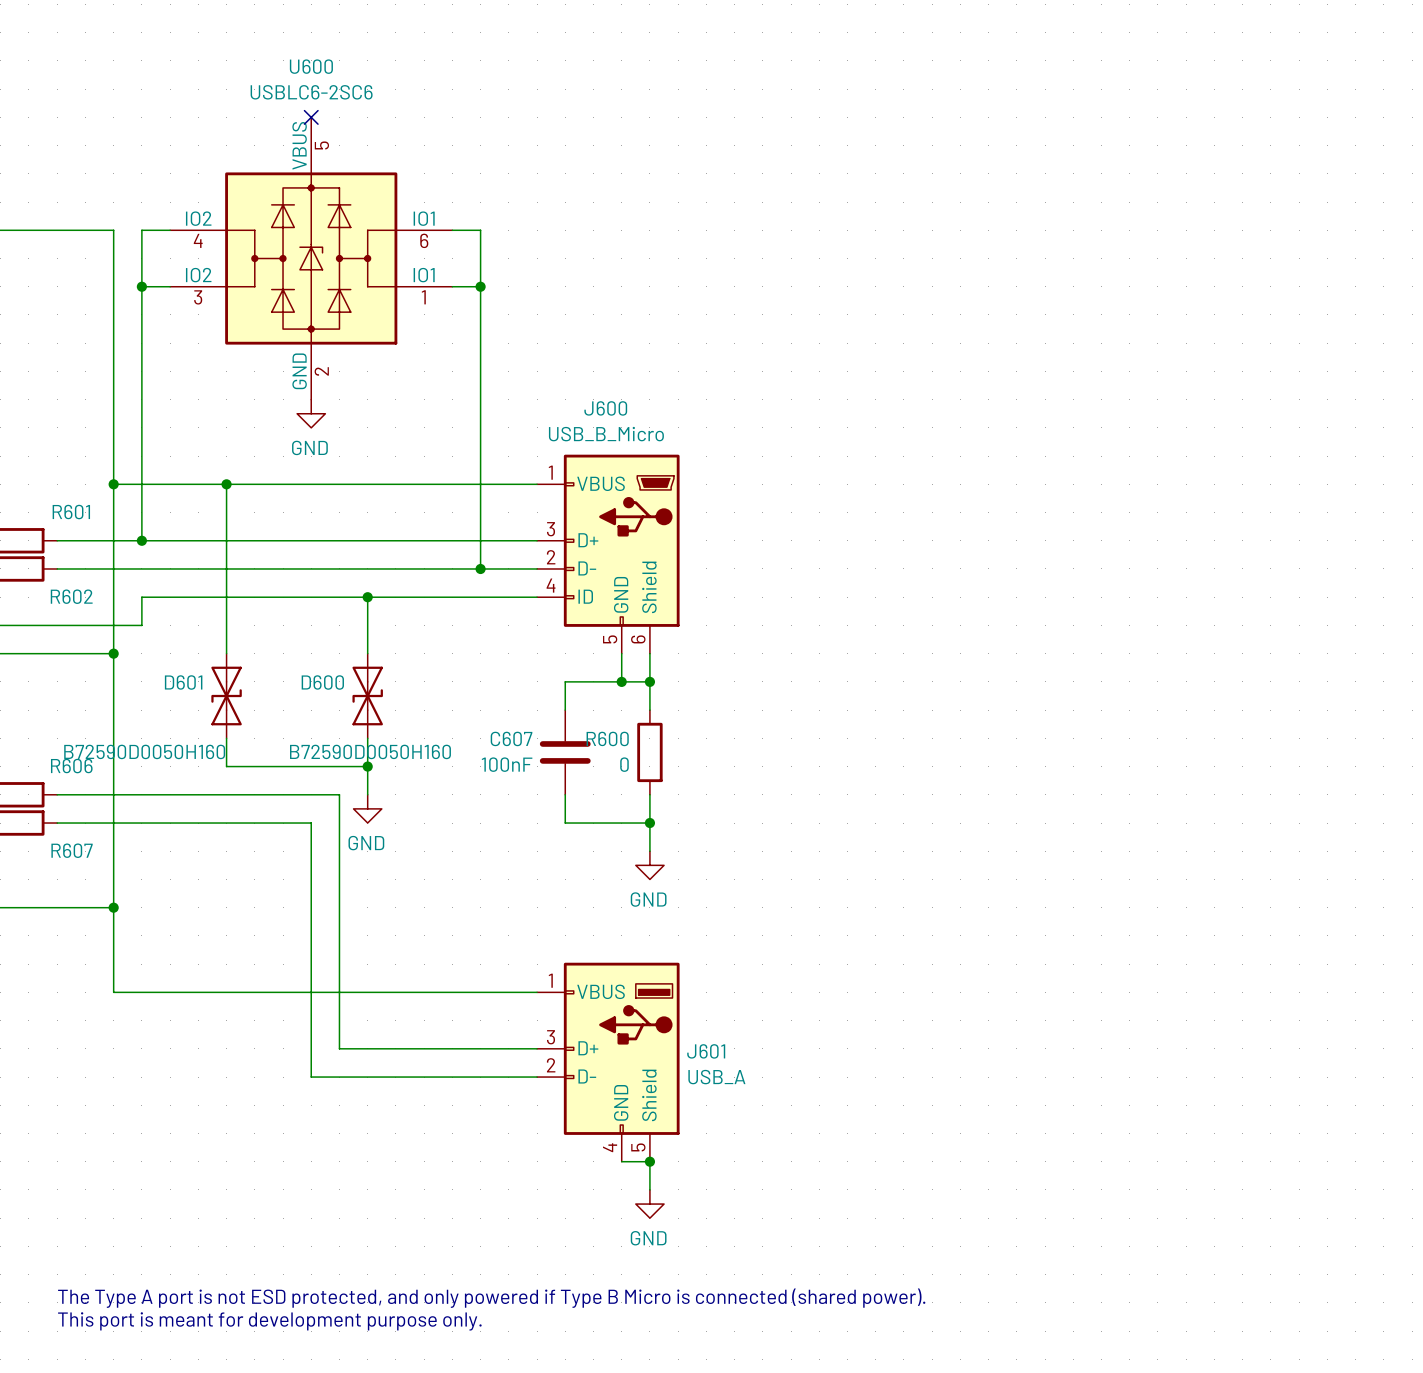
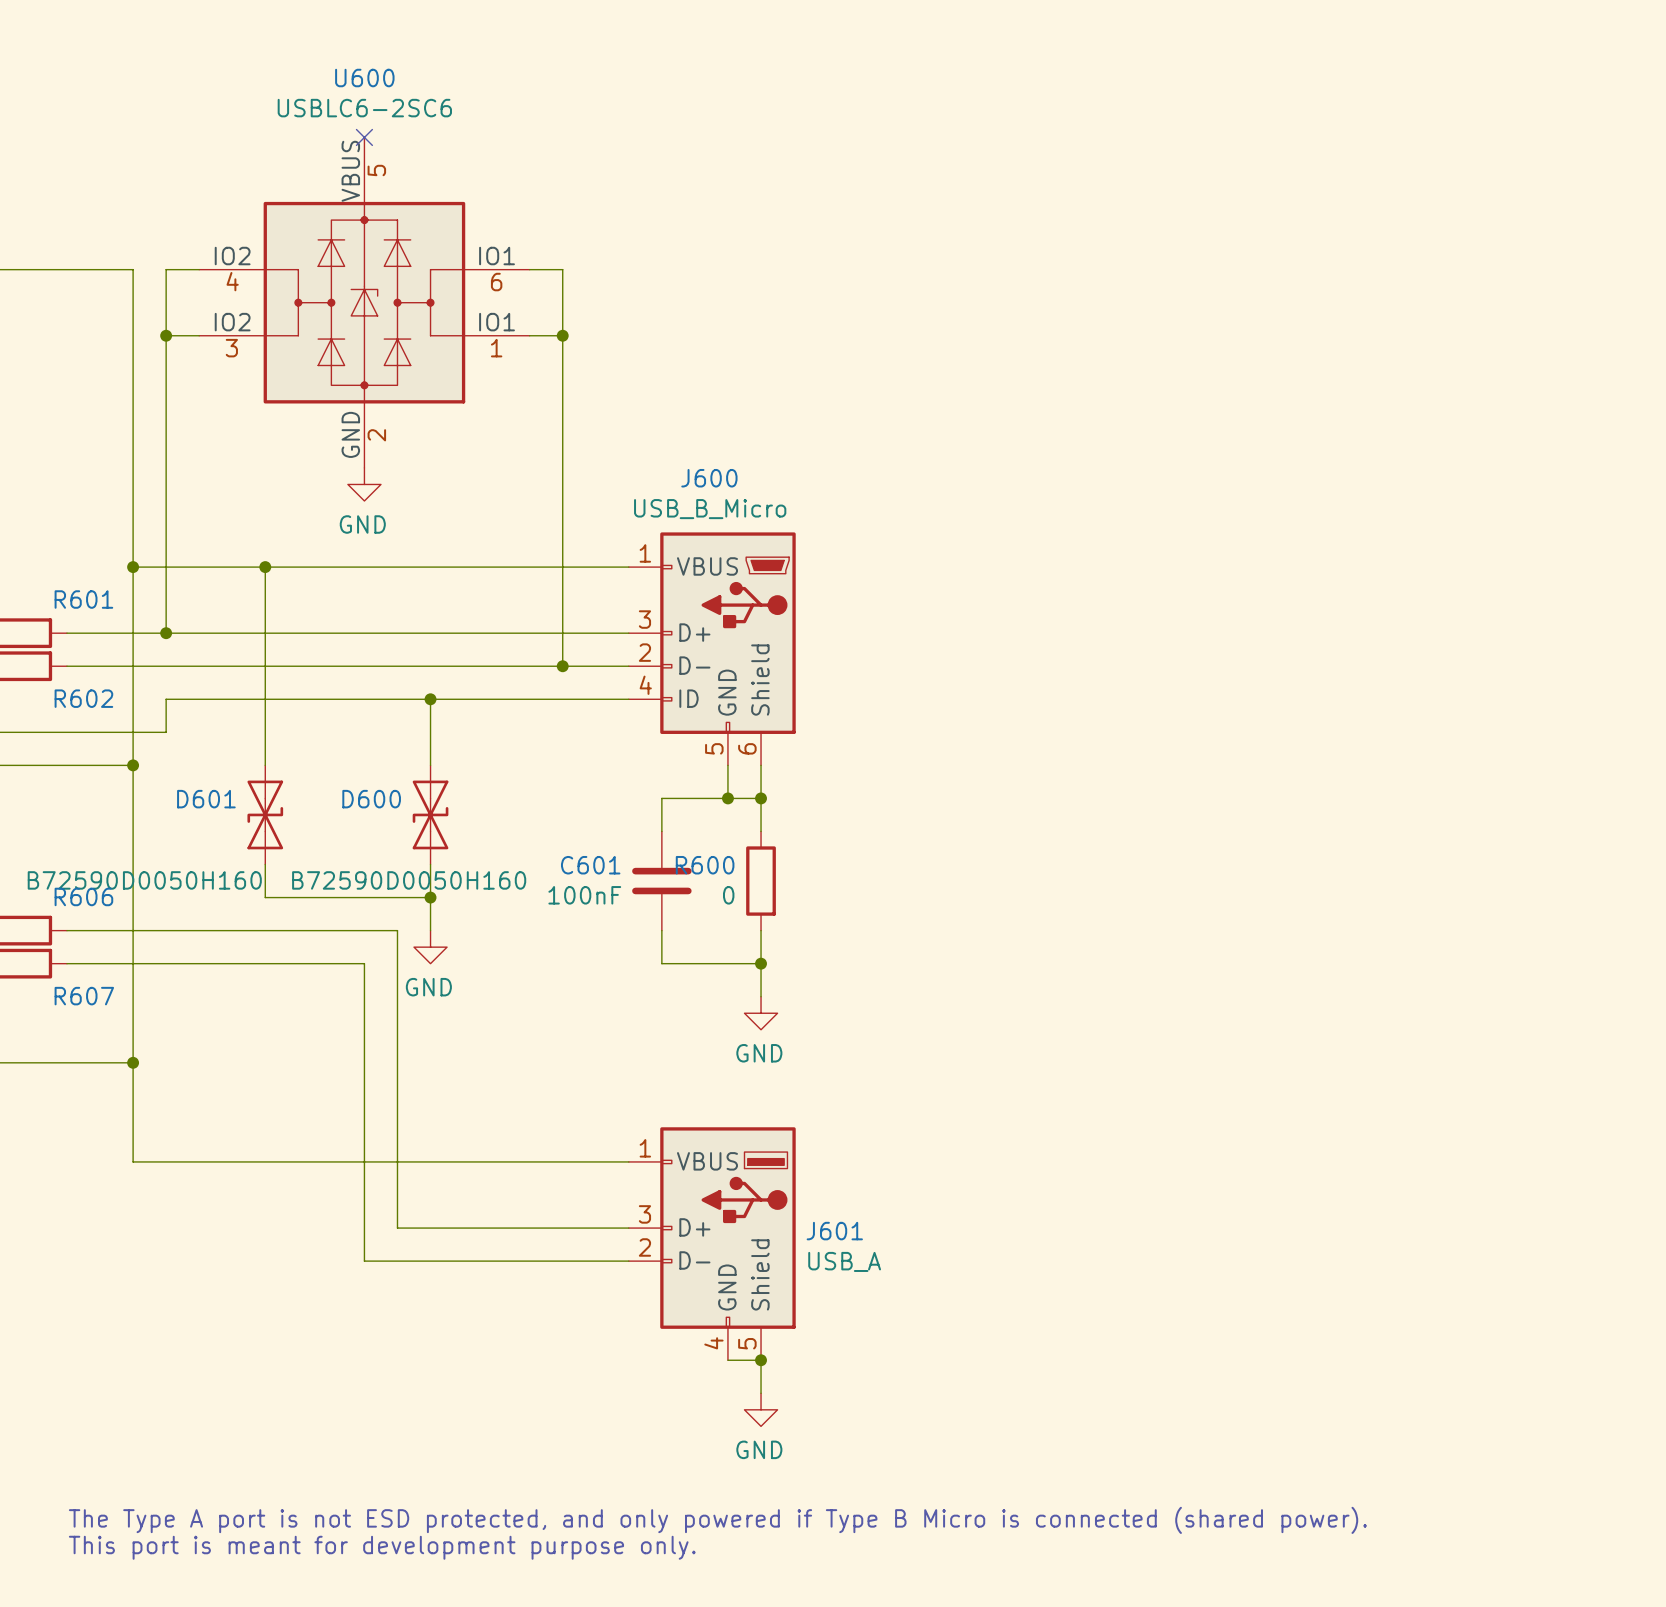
C607 name: C607 (511, 738) -> C601 (590, 865)

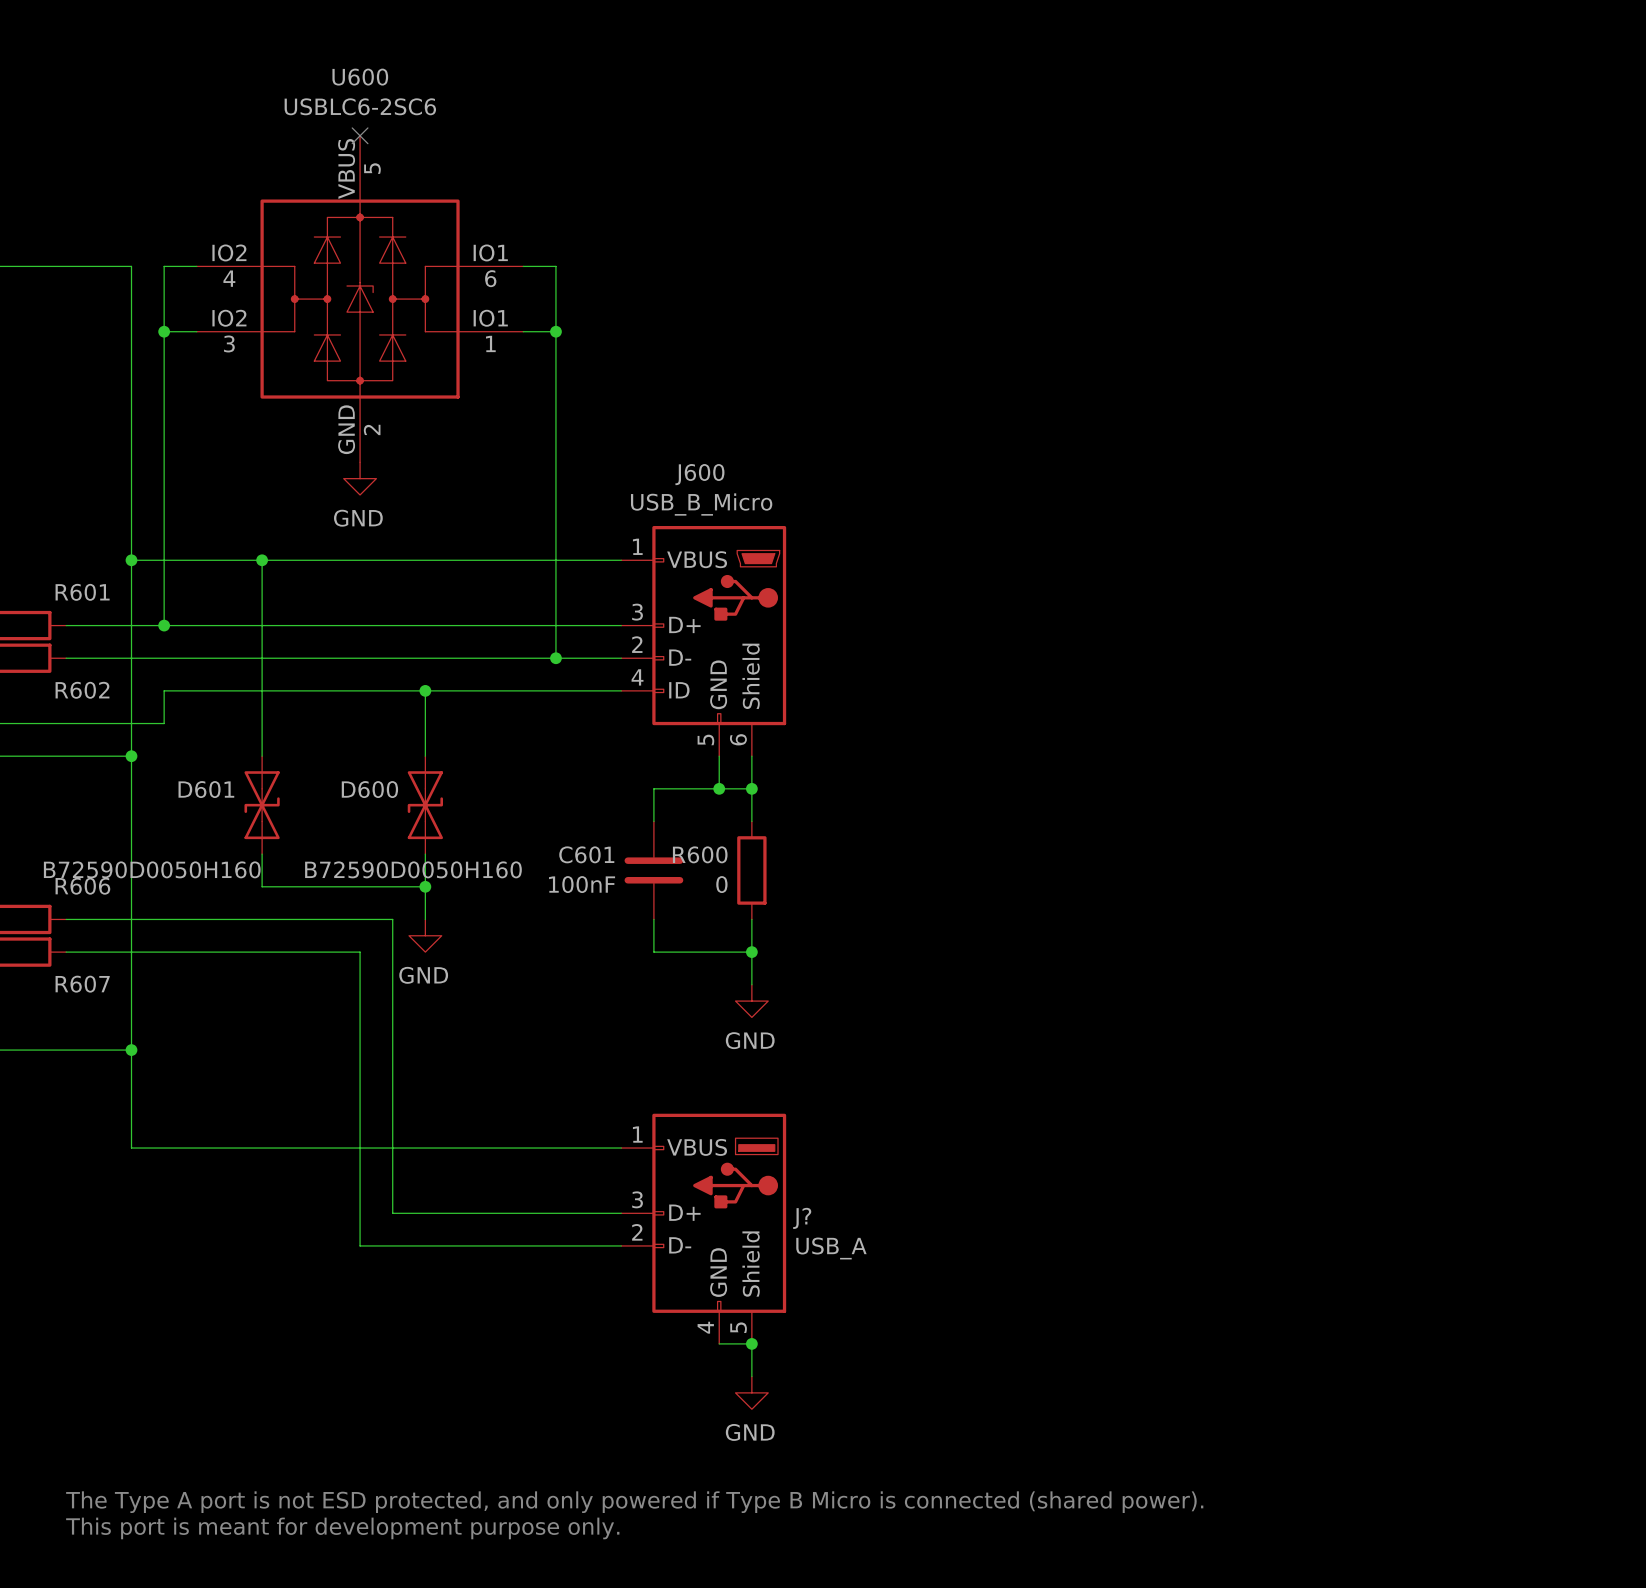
J601 name: J601 (834, 1231) -> J? (802, 1218)

